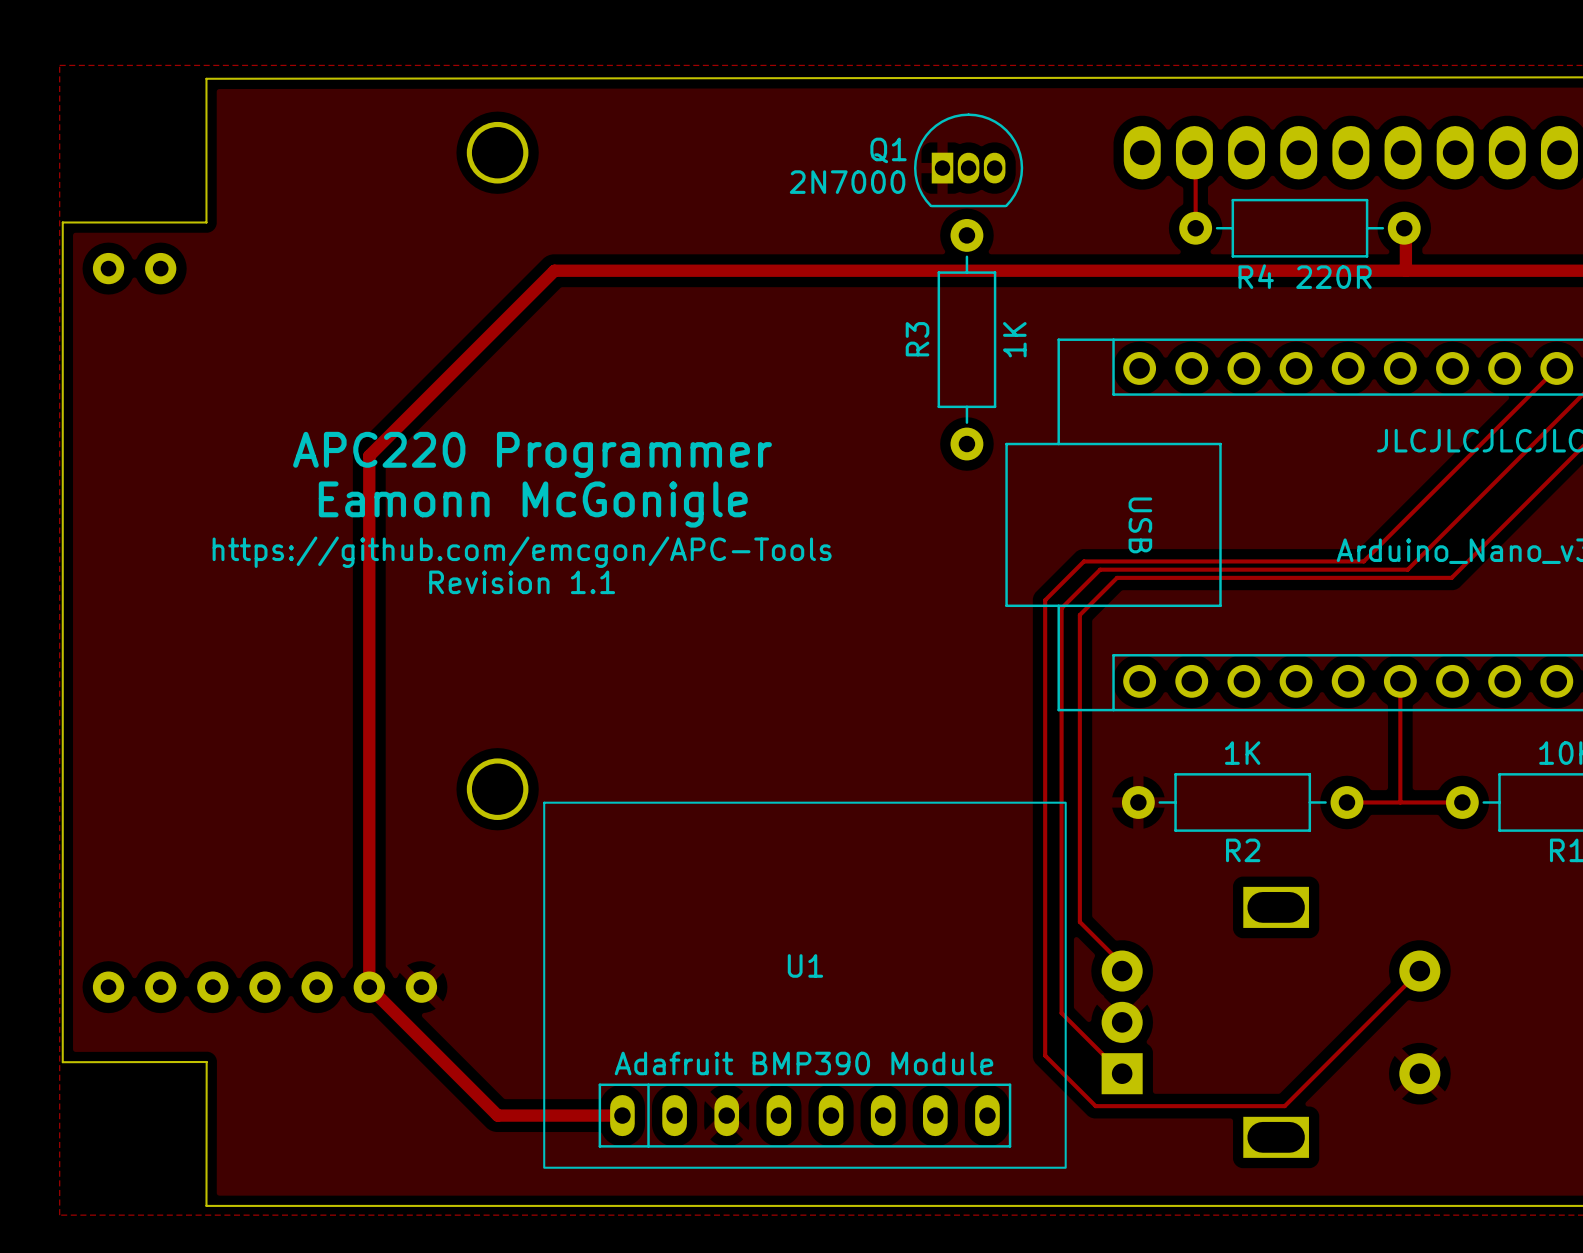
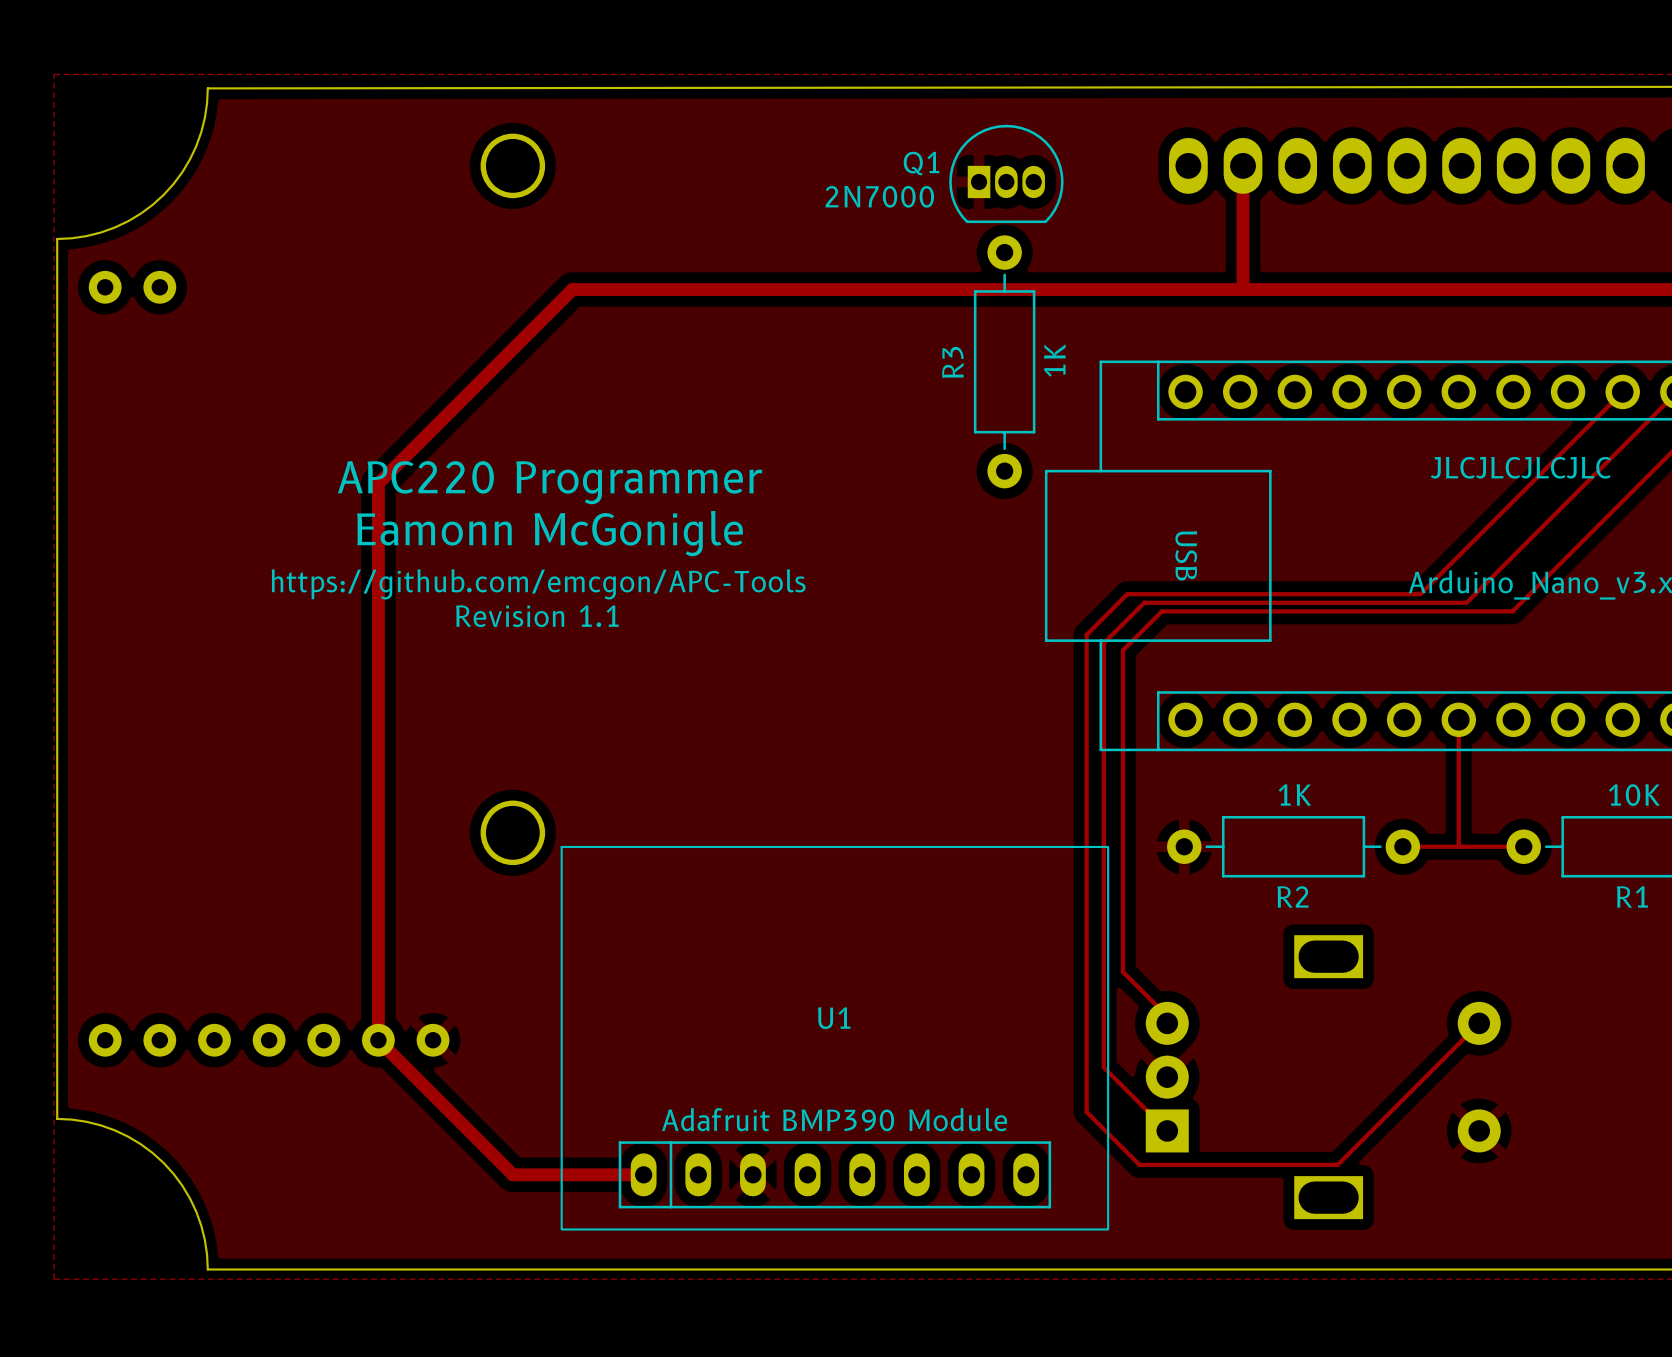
board edge: (206, 78) (206, 222) (62, 222) -> (207, 88) (204, 117) (196, 146) (182, 172) (163, 194) (140, 213) (114, 227) (86, 236) (57, 238)
track: (1194, 152) (1195, 228) -> (1243, 165) (1243, 289)
R4: 220R (1299, 228) -> none
track: (1405, 228) (1405, 270) -> none
board edge: (62, 1062) (206, 1062) (206, 1205) -> (57, 1118) (86, 1121) (114, 1130) (140, 1144) (163, 1162) (182, 1185) (196, 1211) (204, 1240) (207, 1269)

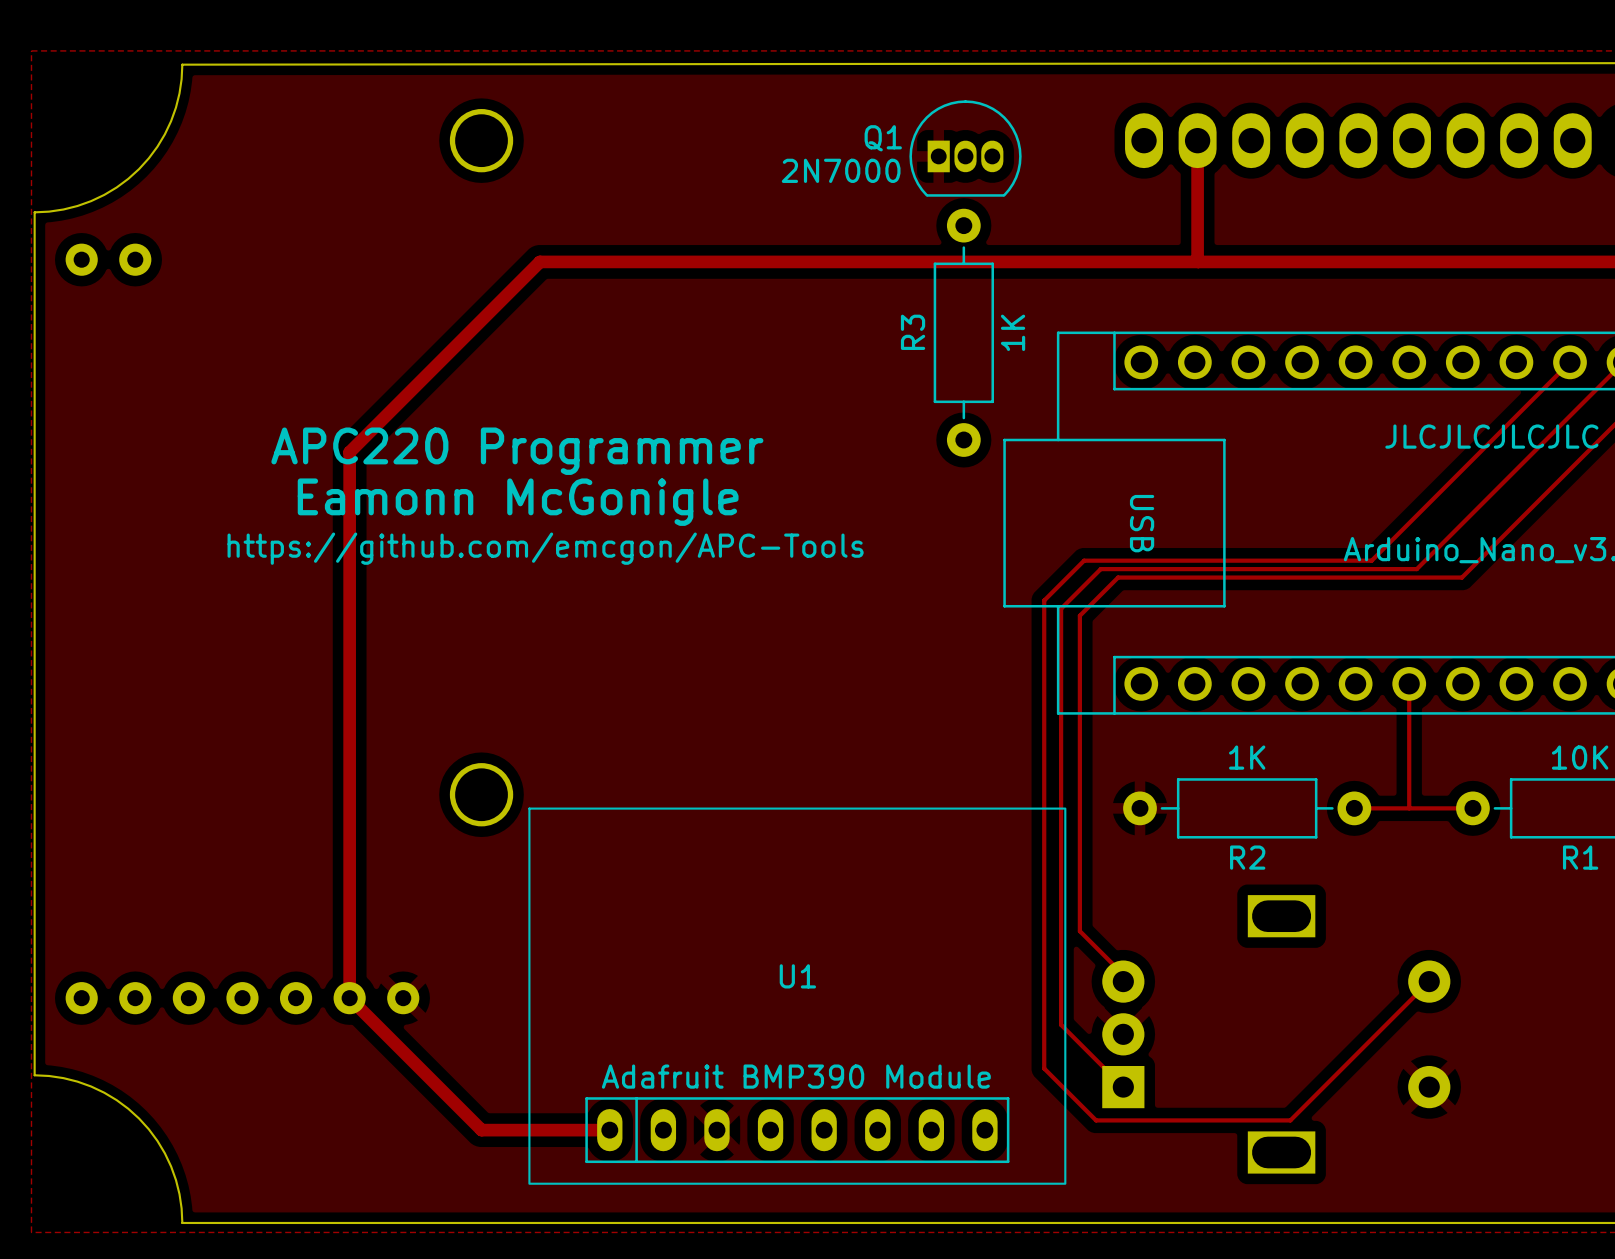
text position: https://github.com/emcgon/APC-Tools (538, 584) -> https://github.com/emcgon/APC-Tools (545, 548)
text: Revision 1.1 (537, 616) -> none

